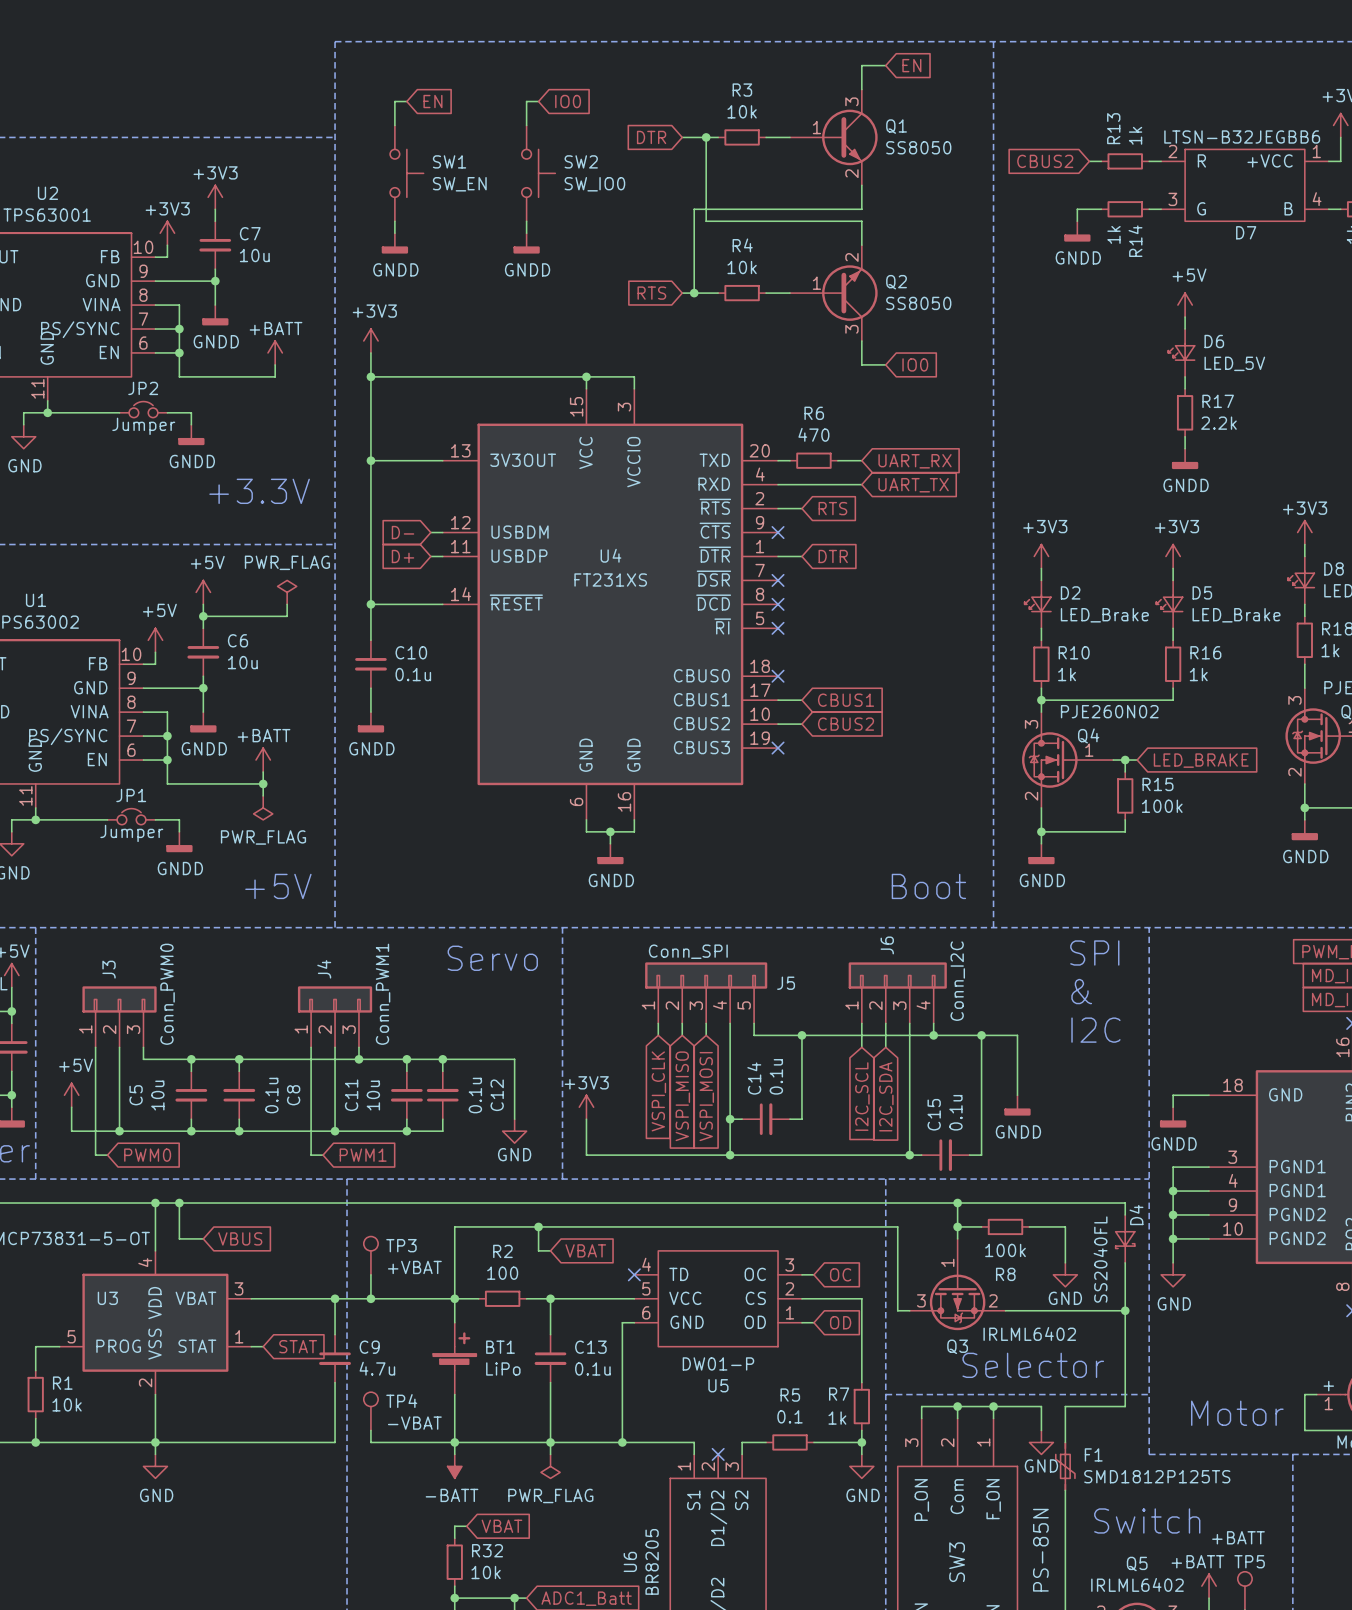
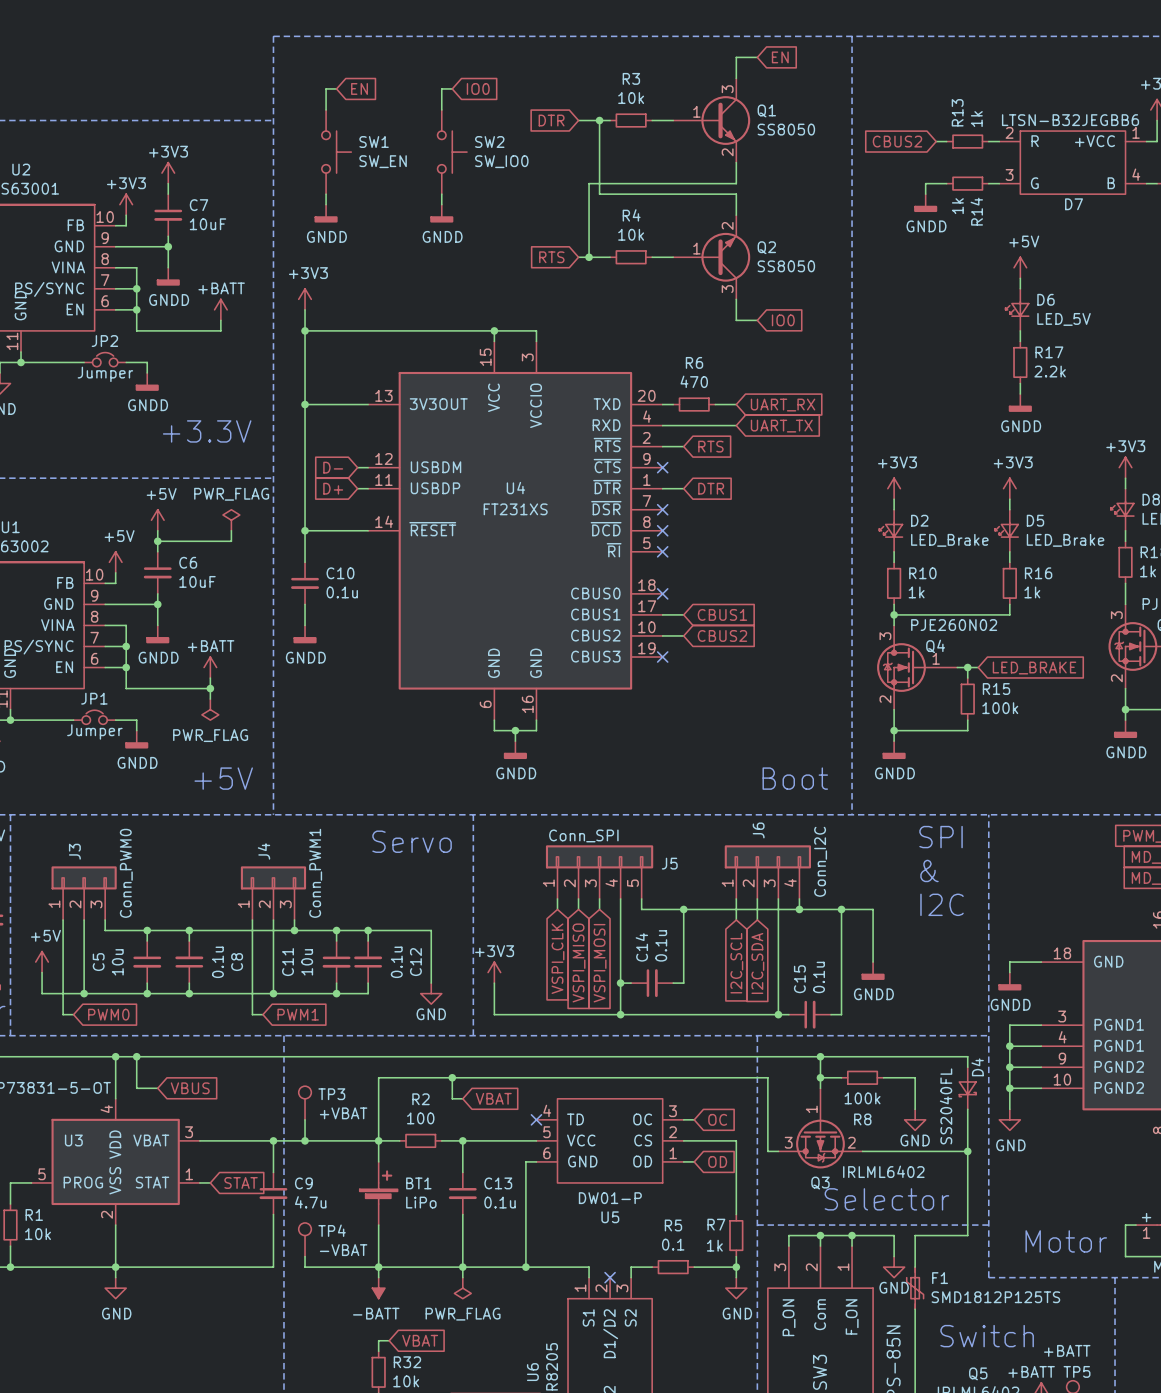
C7 value: 10u (254, 255) -> 10uF (208, 224)
C6 value: 10u (242, 662) -> 10uF (197, 581)

